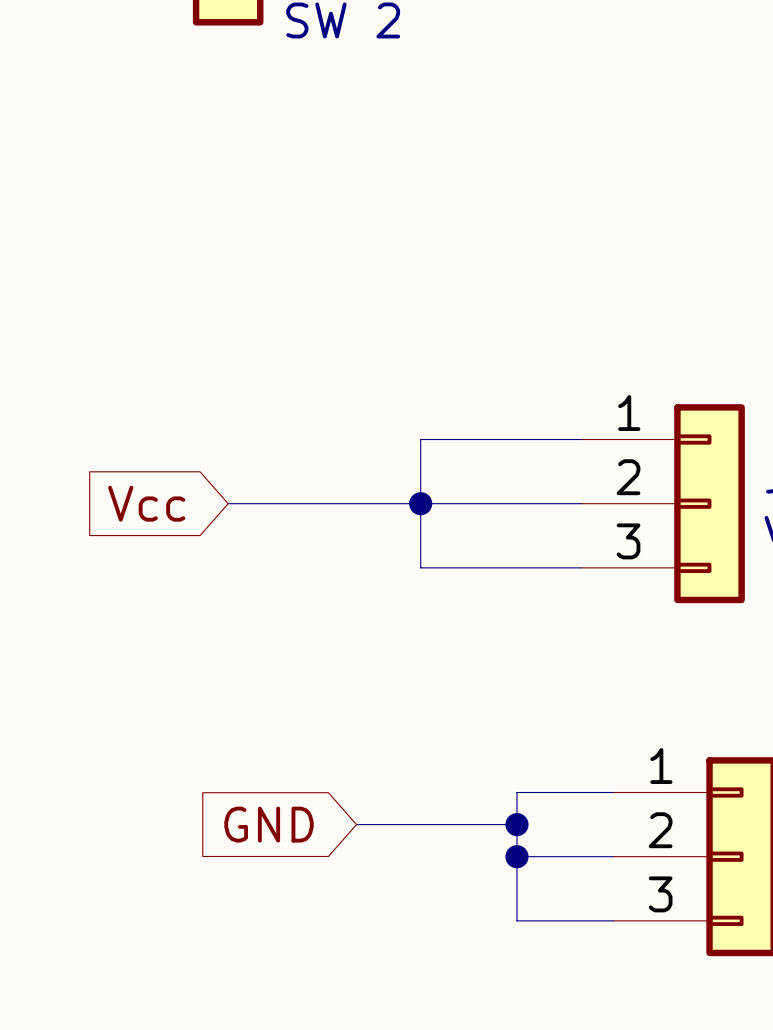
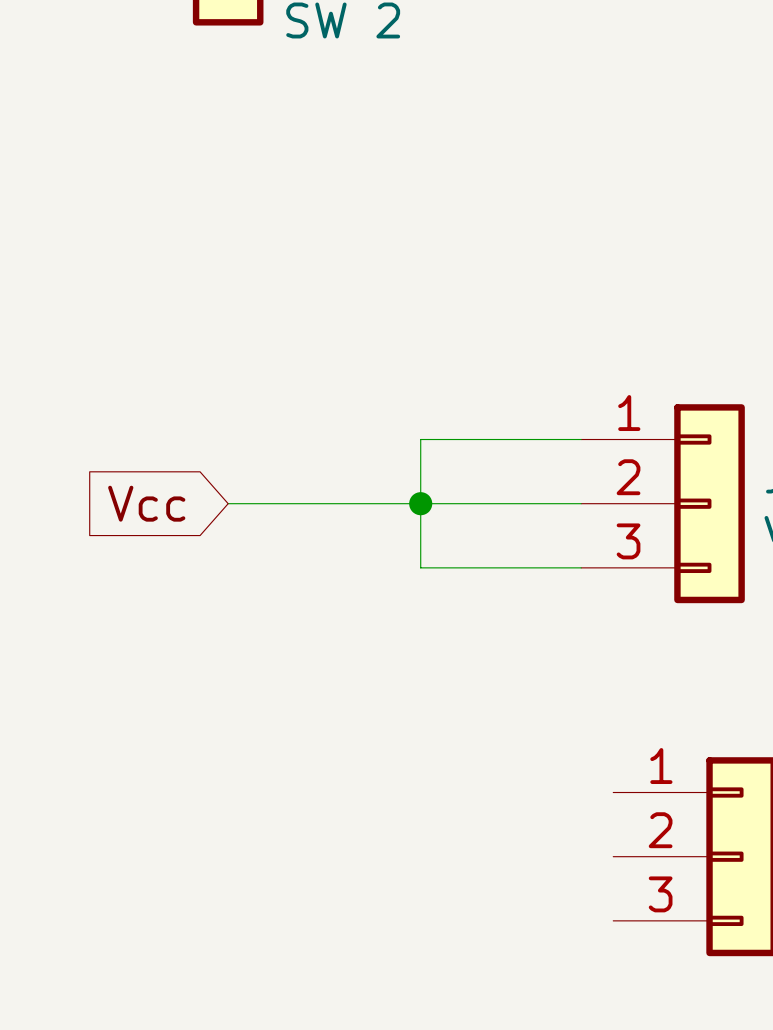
wire: (613, 792) (516, 792) (516, 920) (613, 920) -> none
global label: GND (268, 824) -> none
wire: (356, 824) (516, 824) -> none
junction: (516, 824) -> none
wire: (516, 856) (613, 856) -> none
junction: (516, 856) -> none

